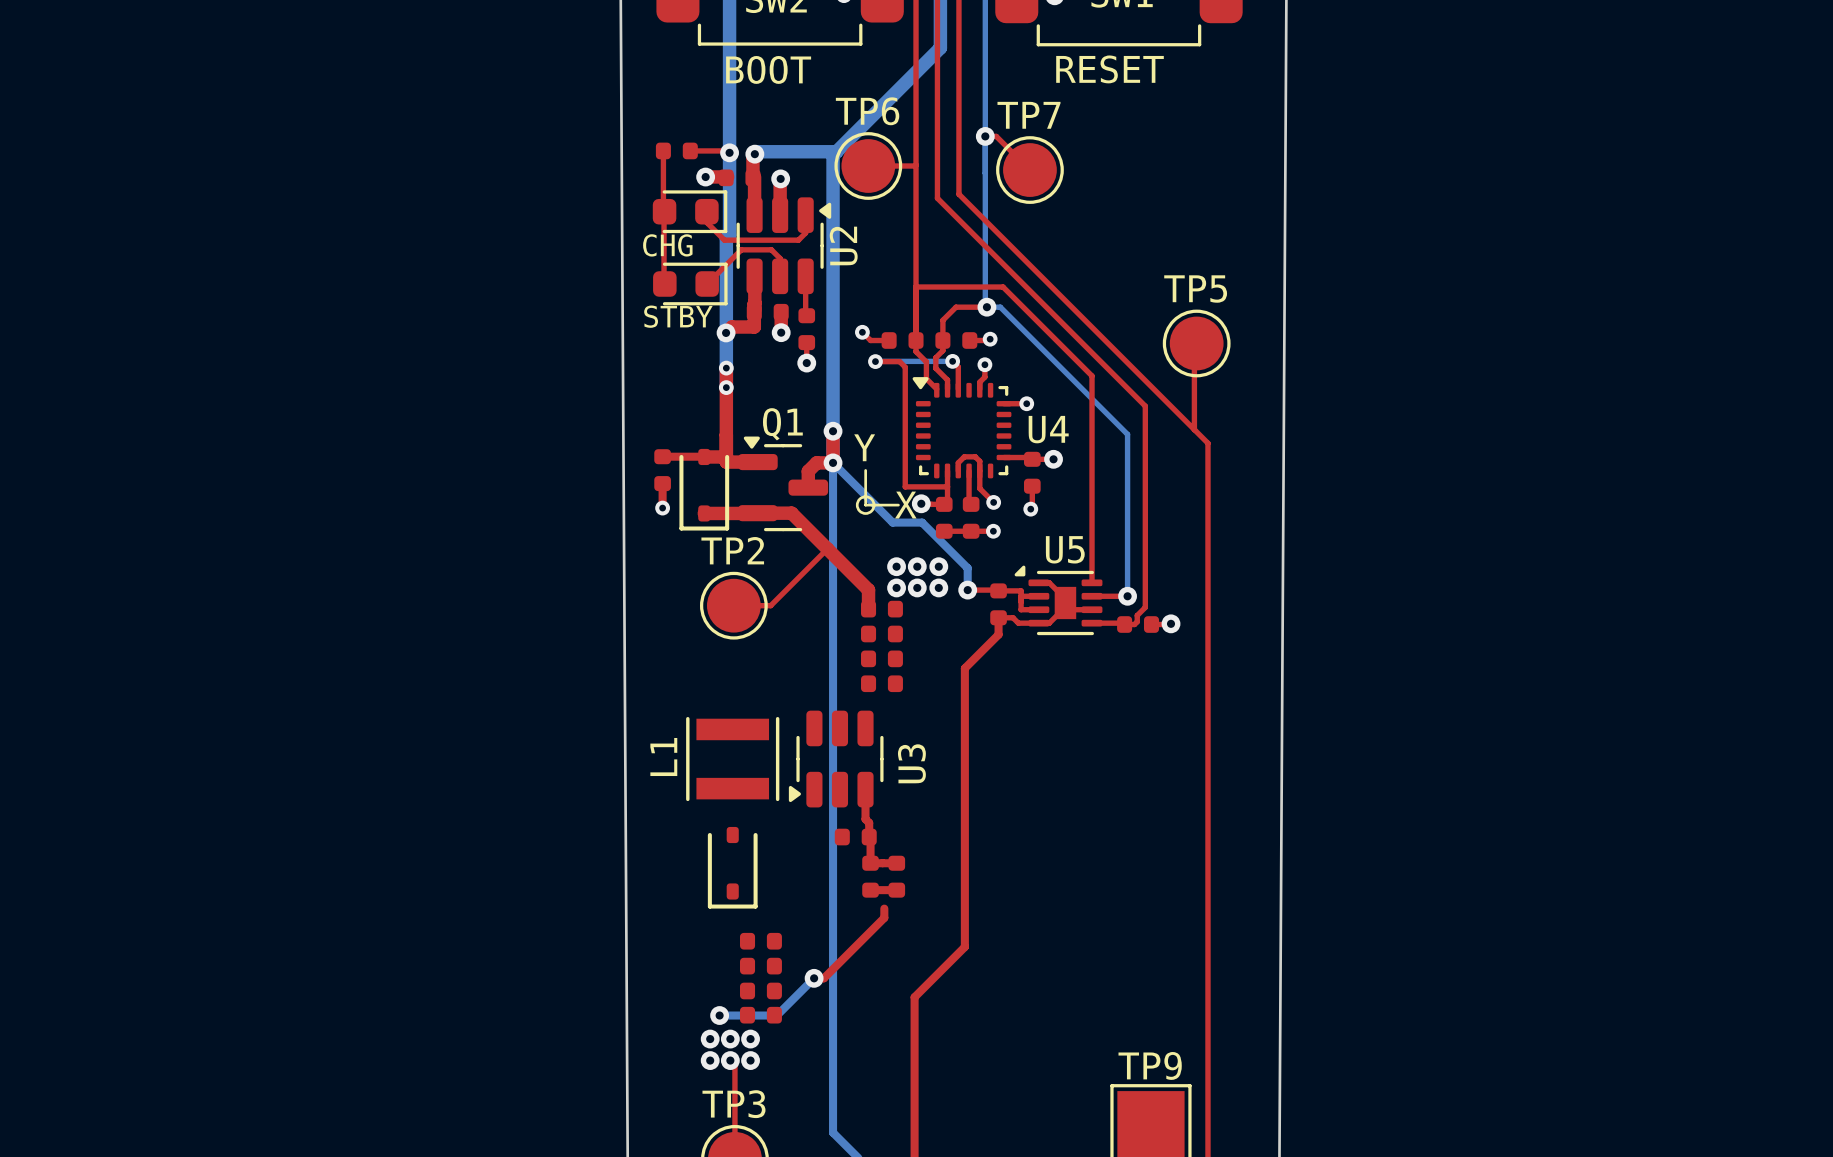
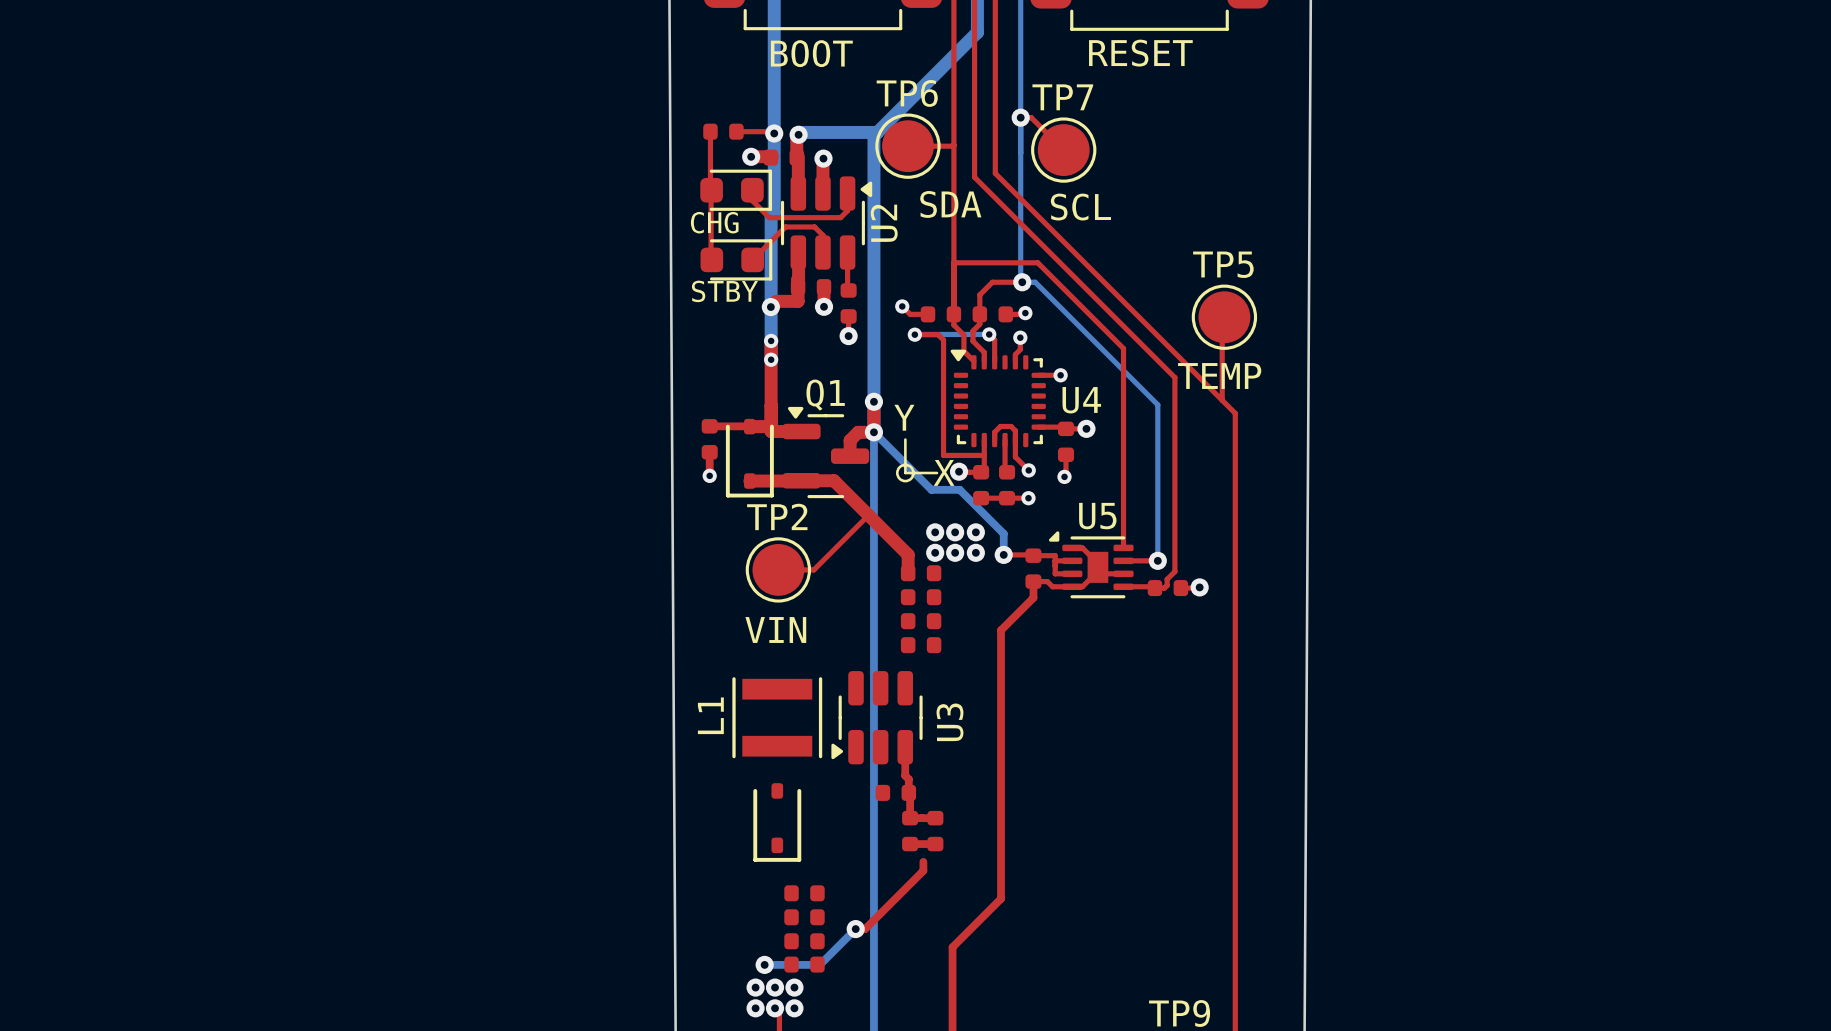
text: none -> SDA (950, 204)
text: none -> SCL (1080, 207)
text: none -> TEMP (1219, 376)
text: none -> VIN (775, 629)

